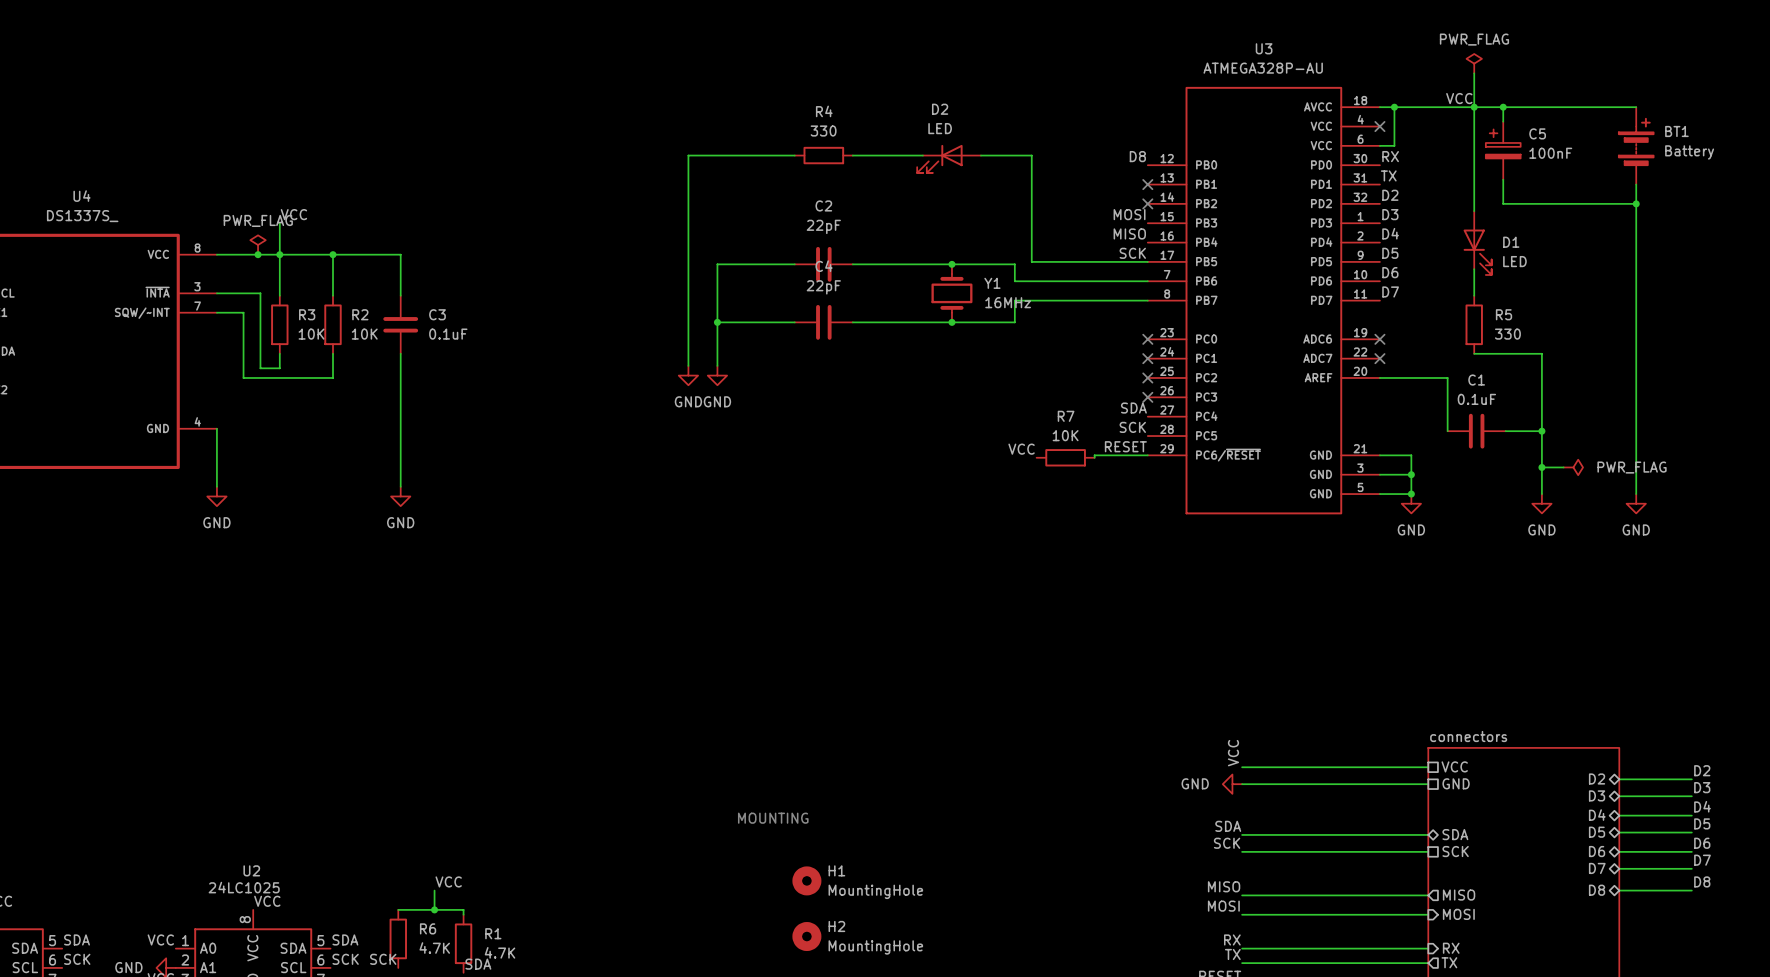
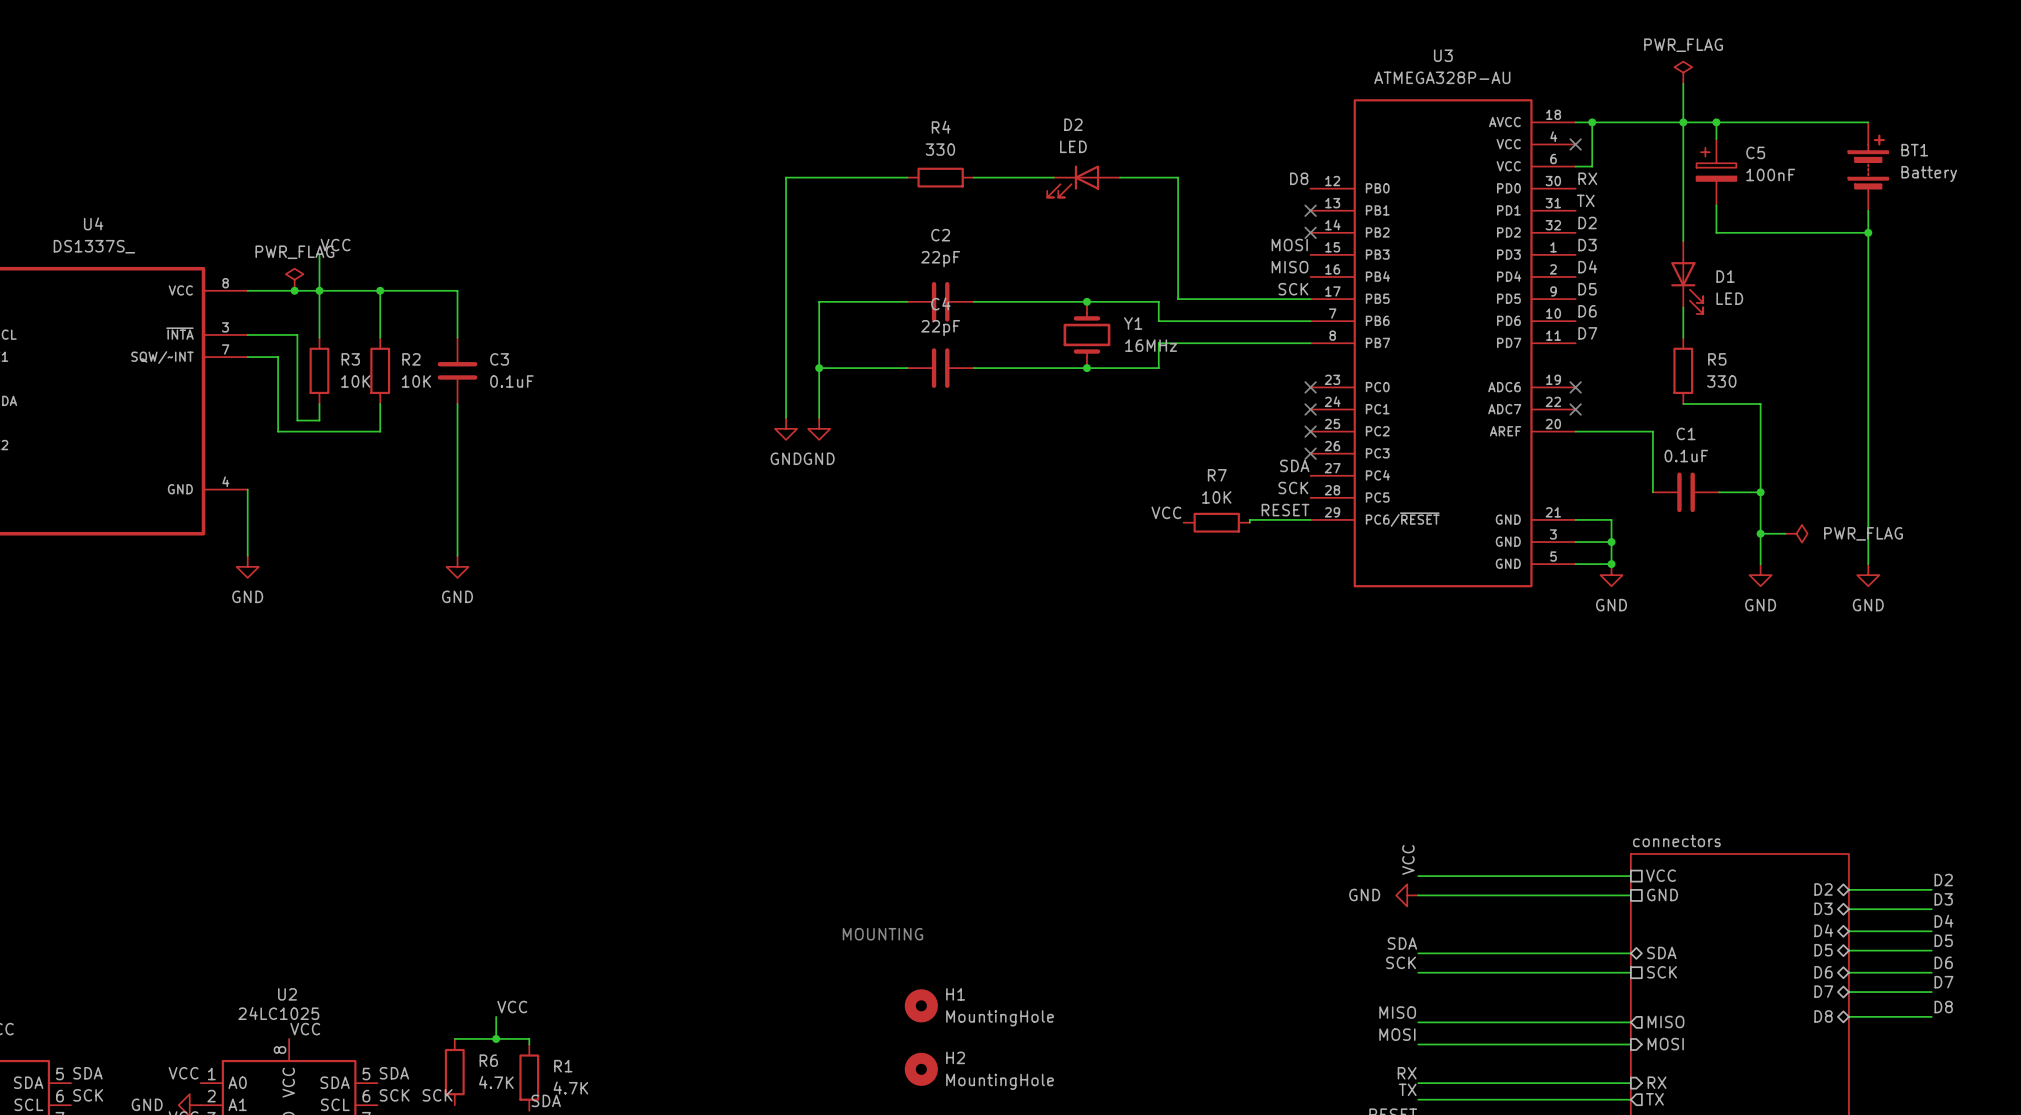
label: VCC (1459, 98) -> none

